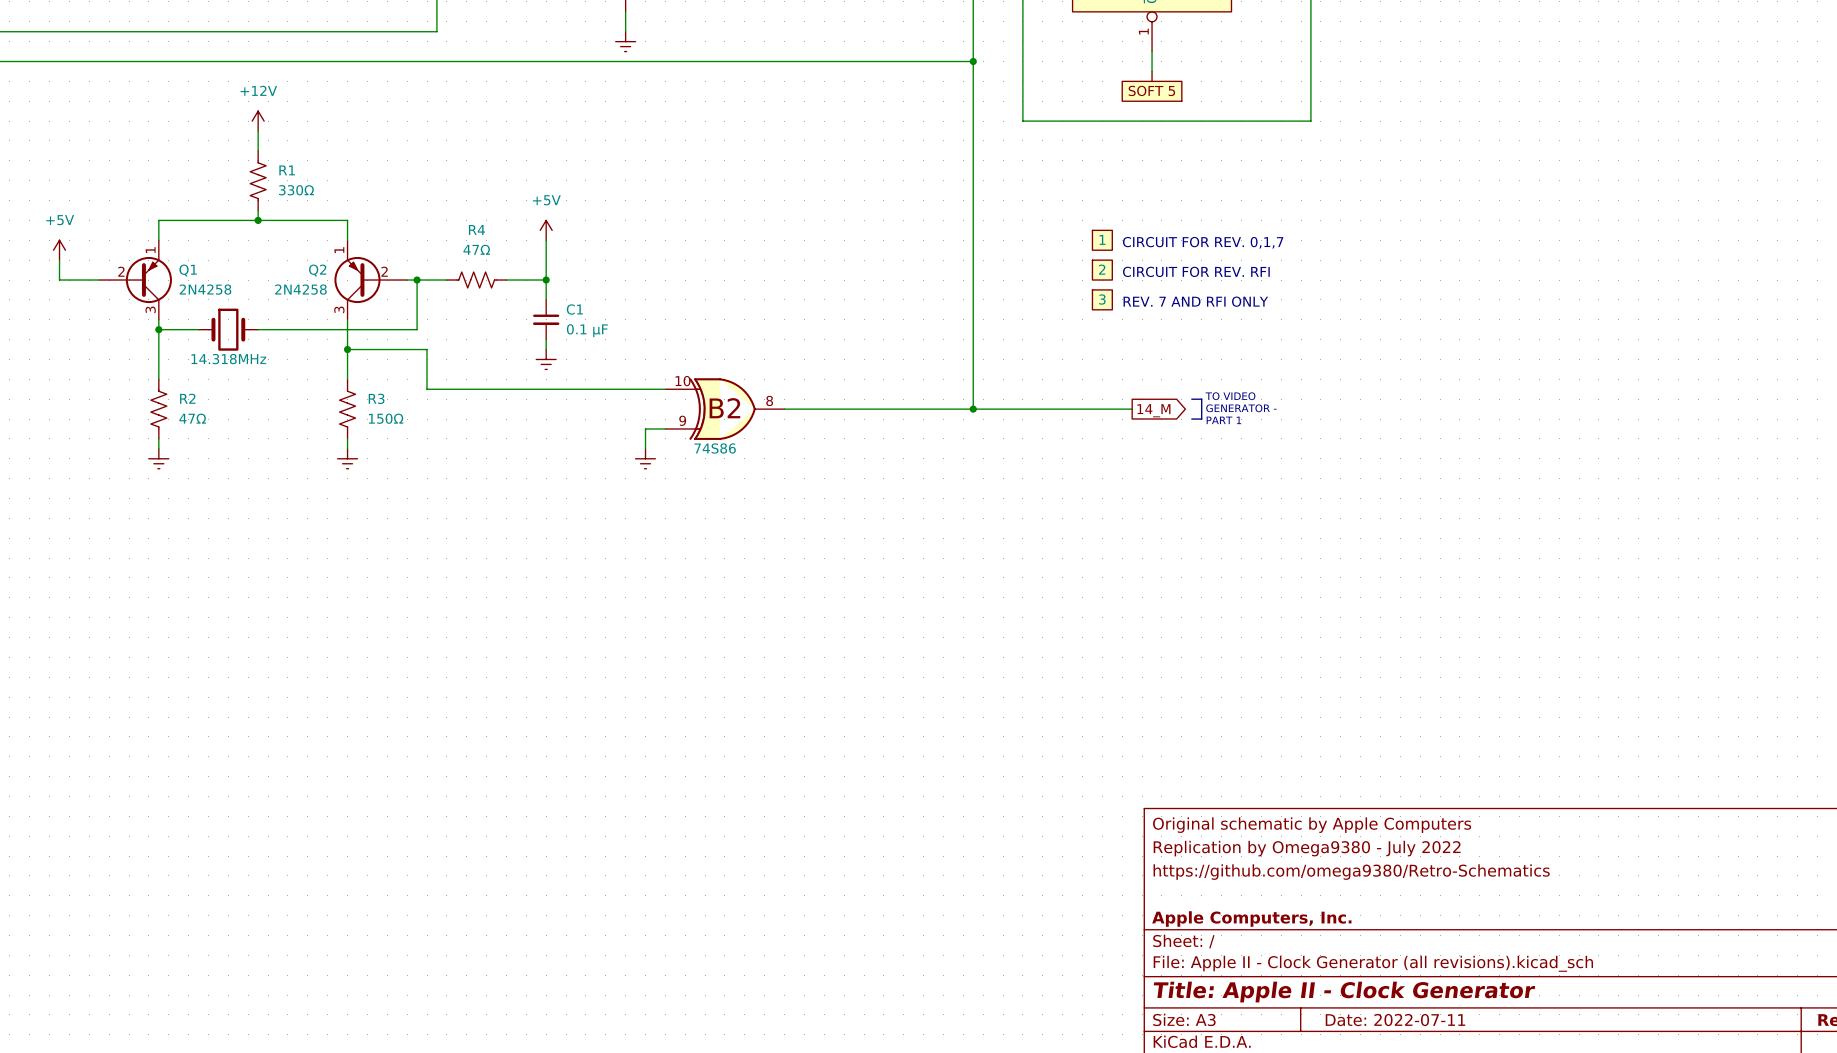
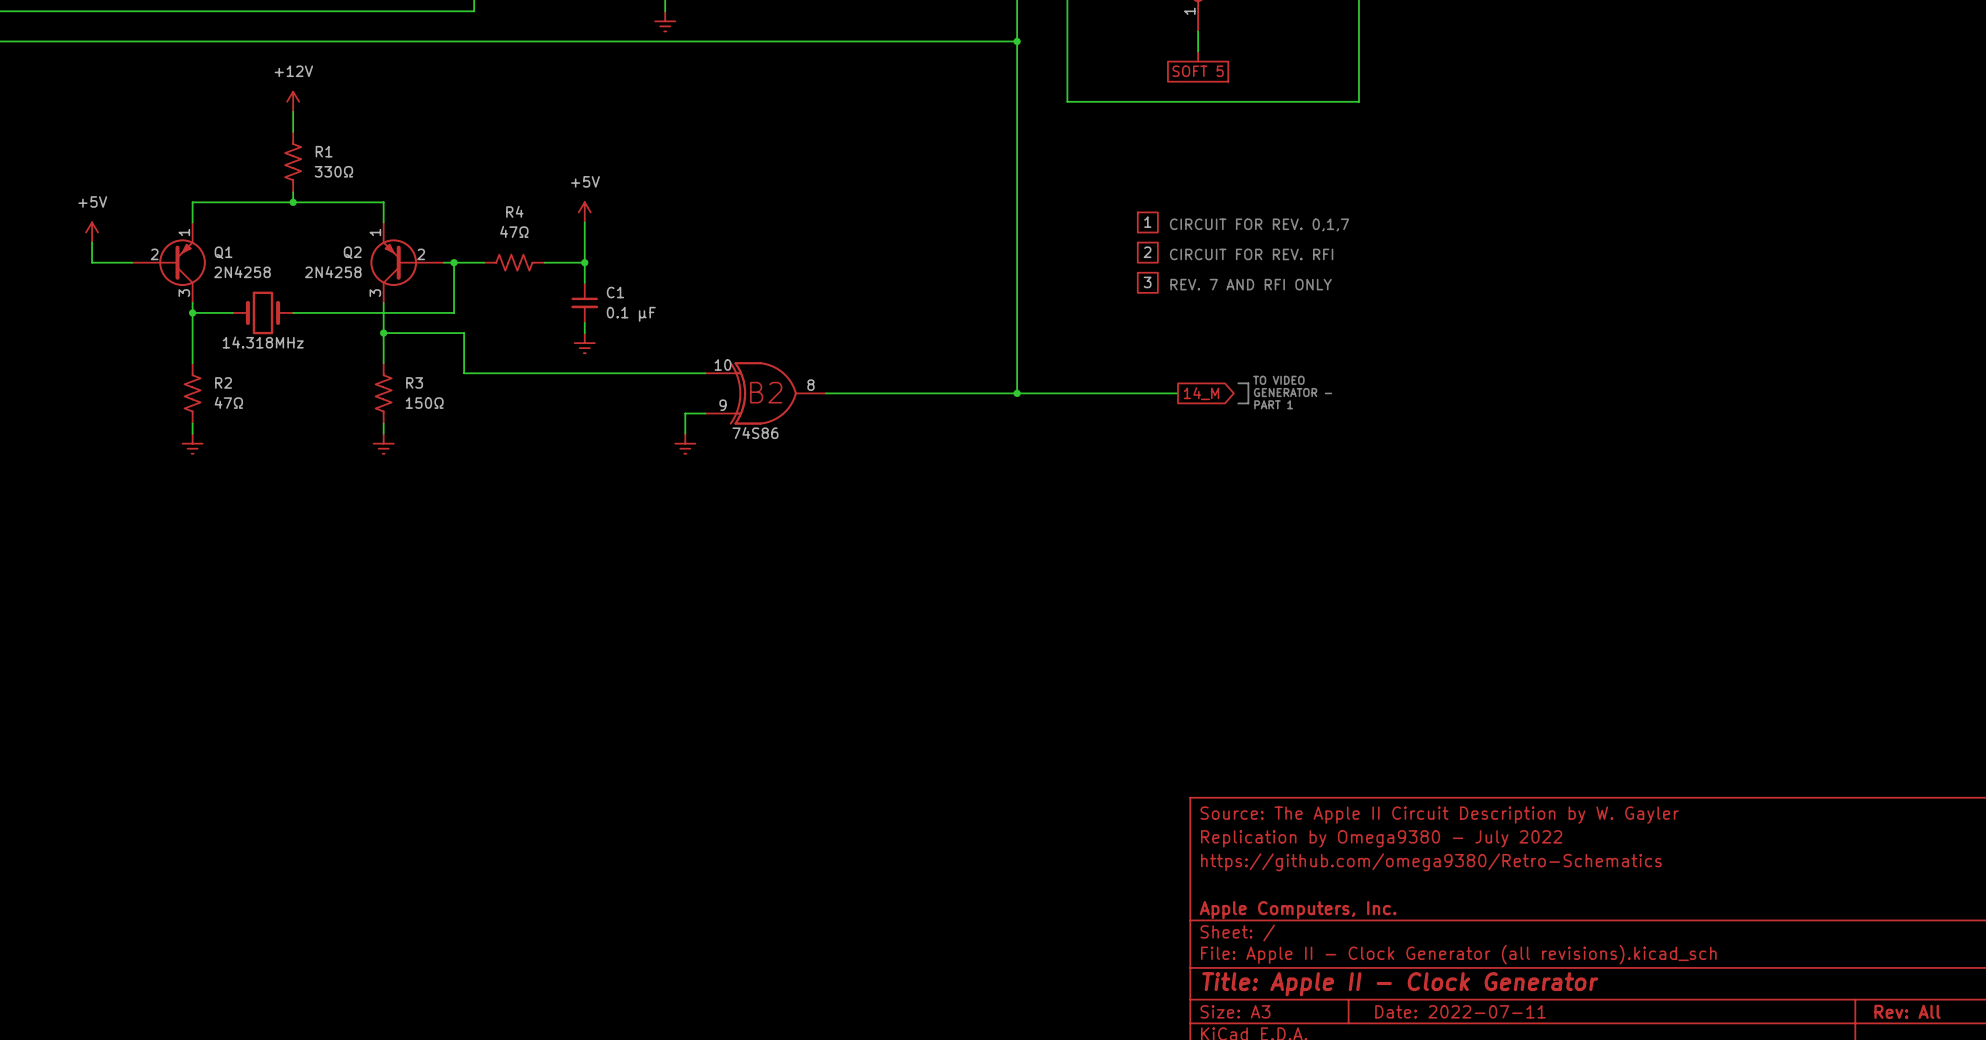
title block: Original schematic by Apple Computers (1312, 825) -> Source: The Apple II Circuit Description by W. Gayler (1439, 815)

